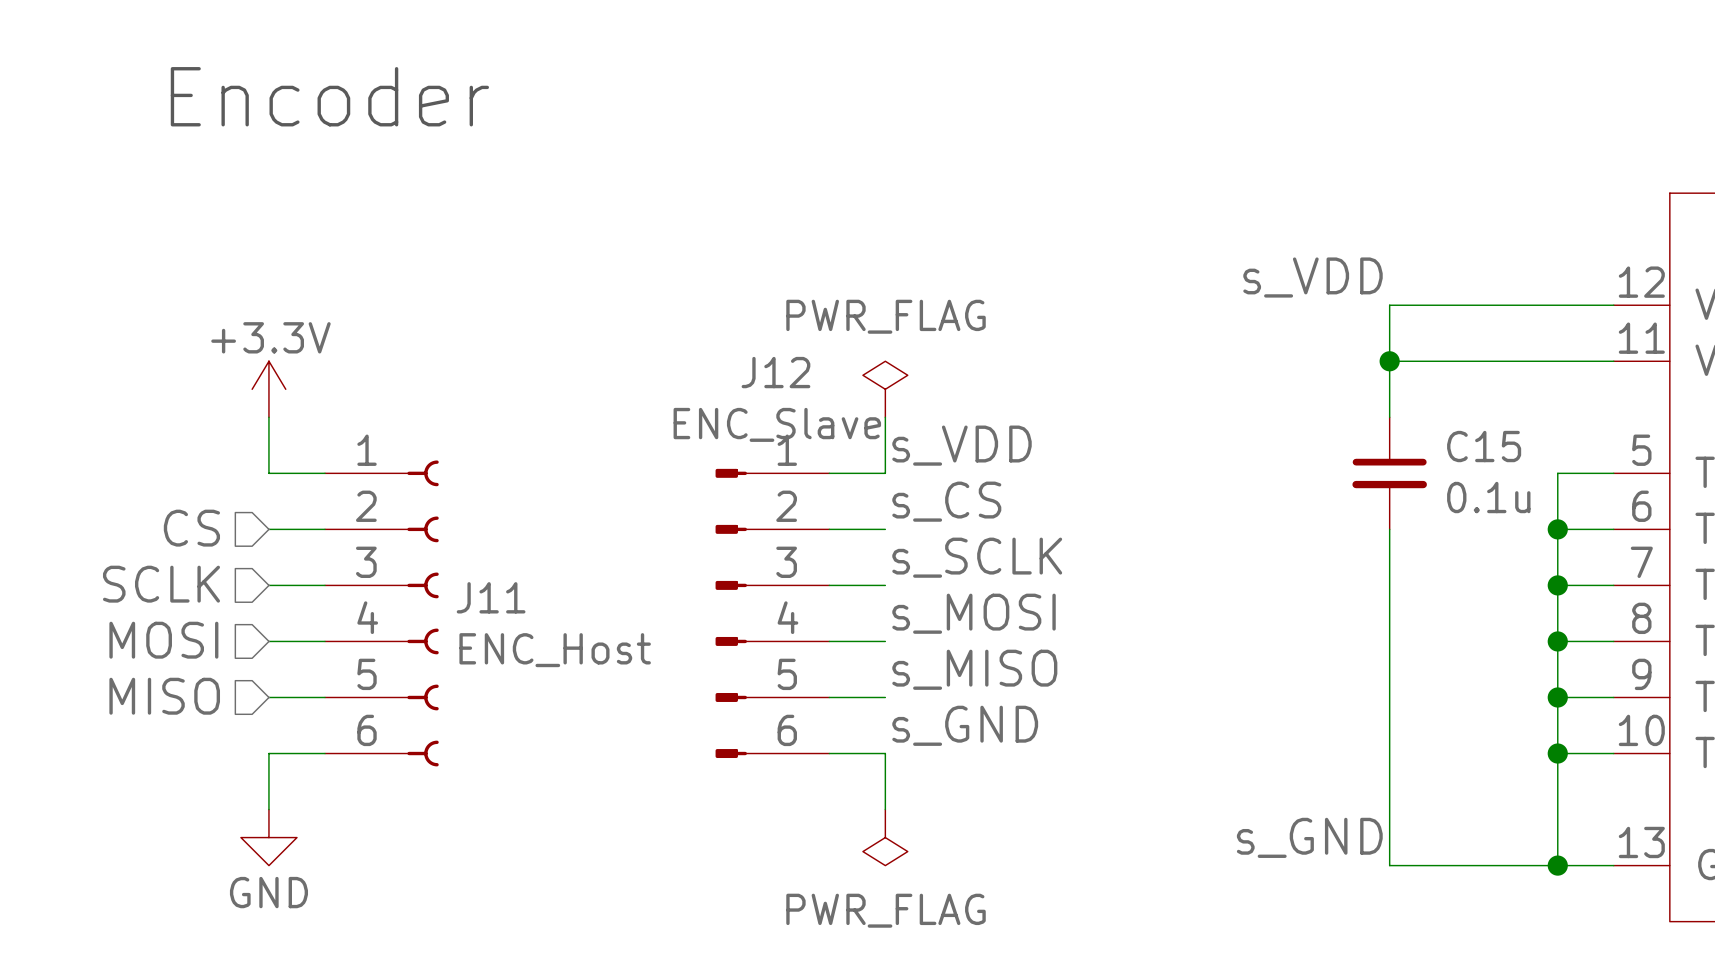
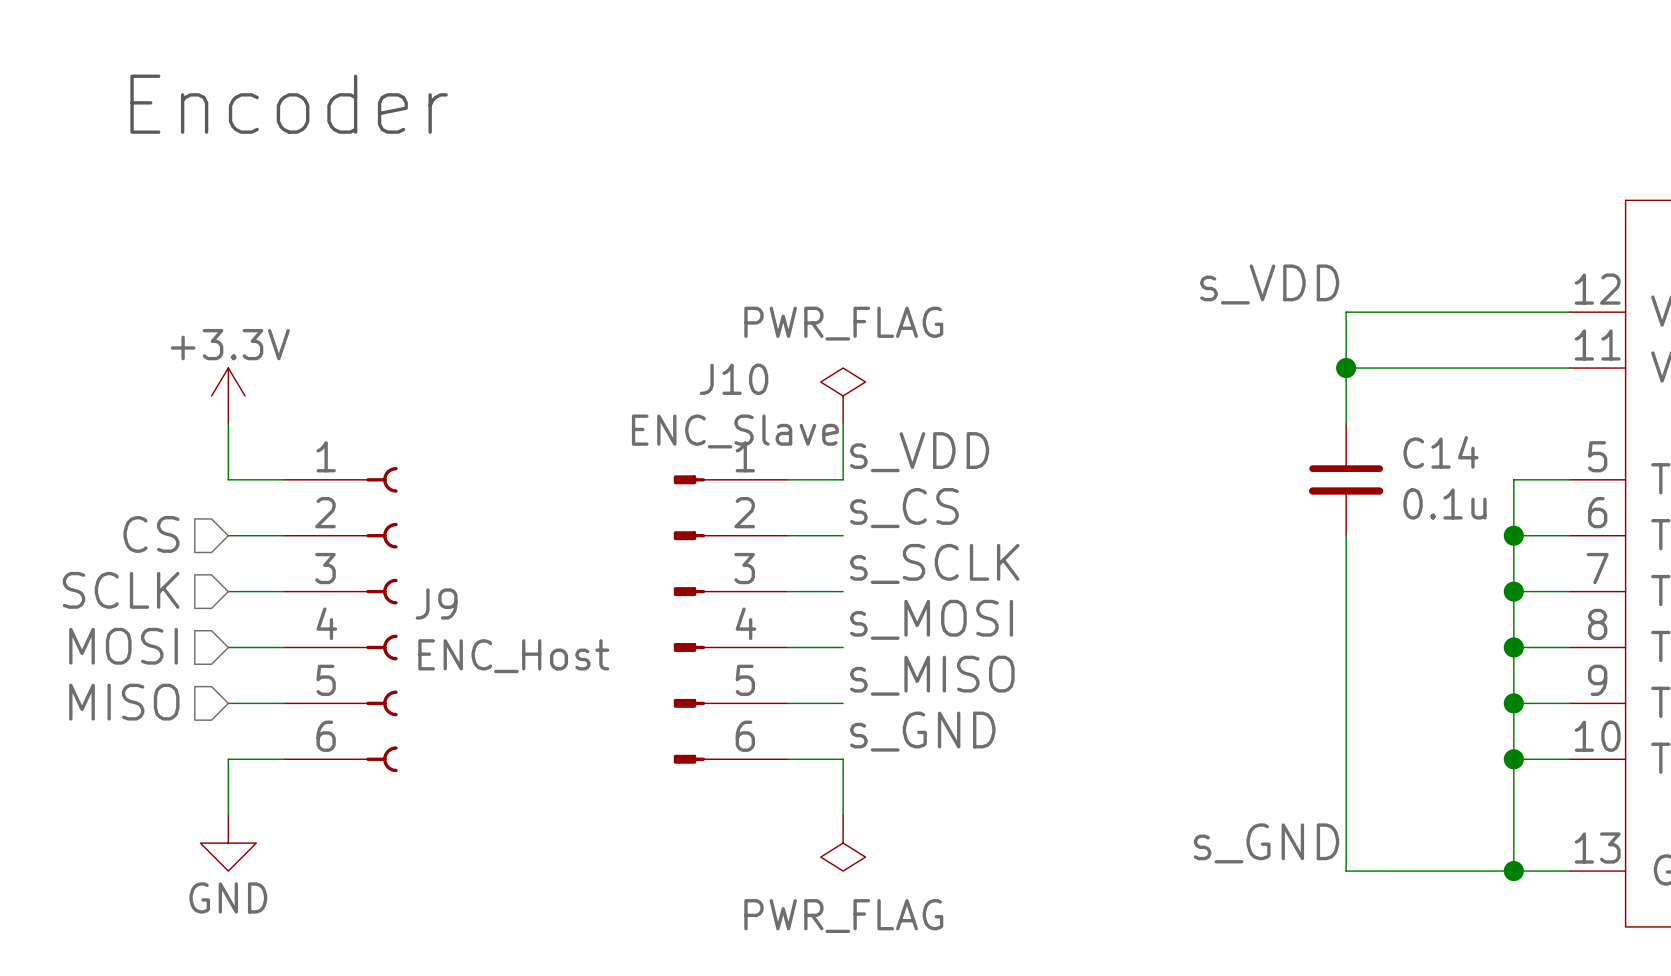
J12 name: J12 (775, 372) -> J10 (734, 379)
C15 name: C15 (1484, 446) -> C14 (1441, 452)
J11 name: J11 (491, 597) -> J9 (436, 603)

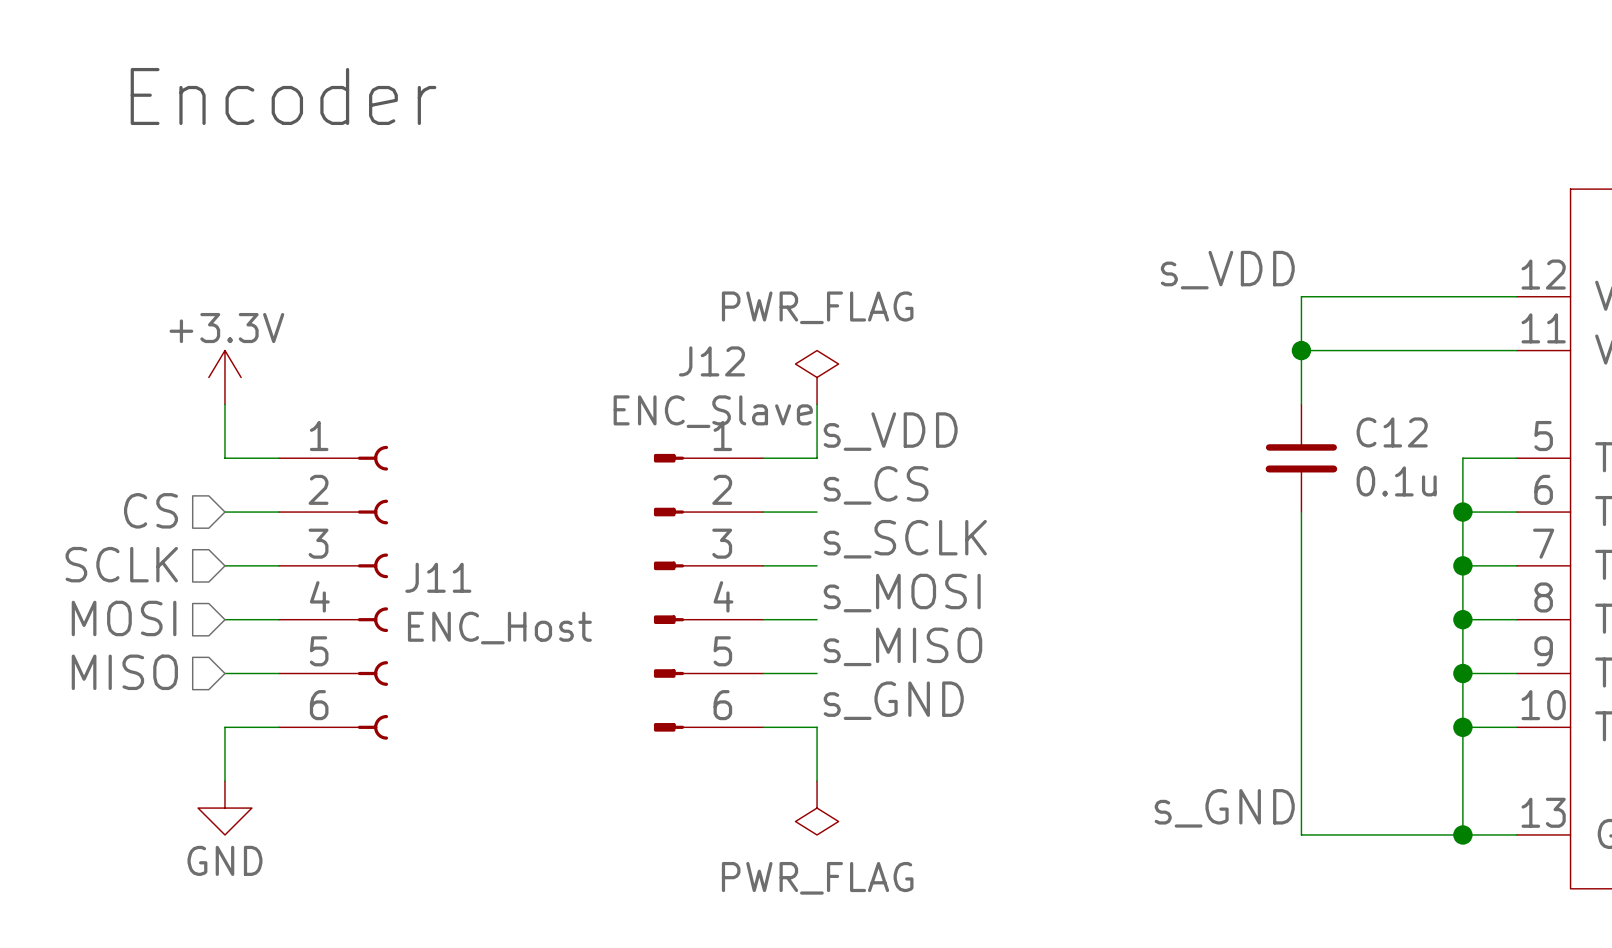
J10 name: J10 (734, 379) -> J12 (711, 361)
C14 name: C14 (1441, 452) -> C12 (1392, 432)
J9 name: J9 (436, 603) -> J11 (438, 577)

